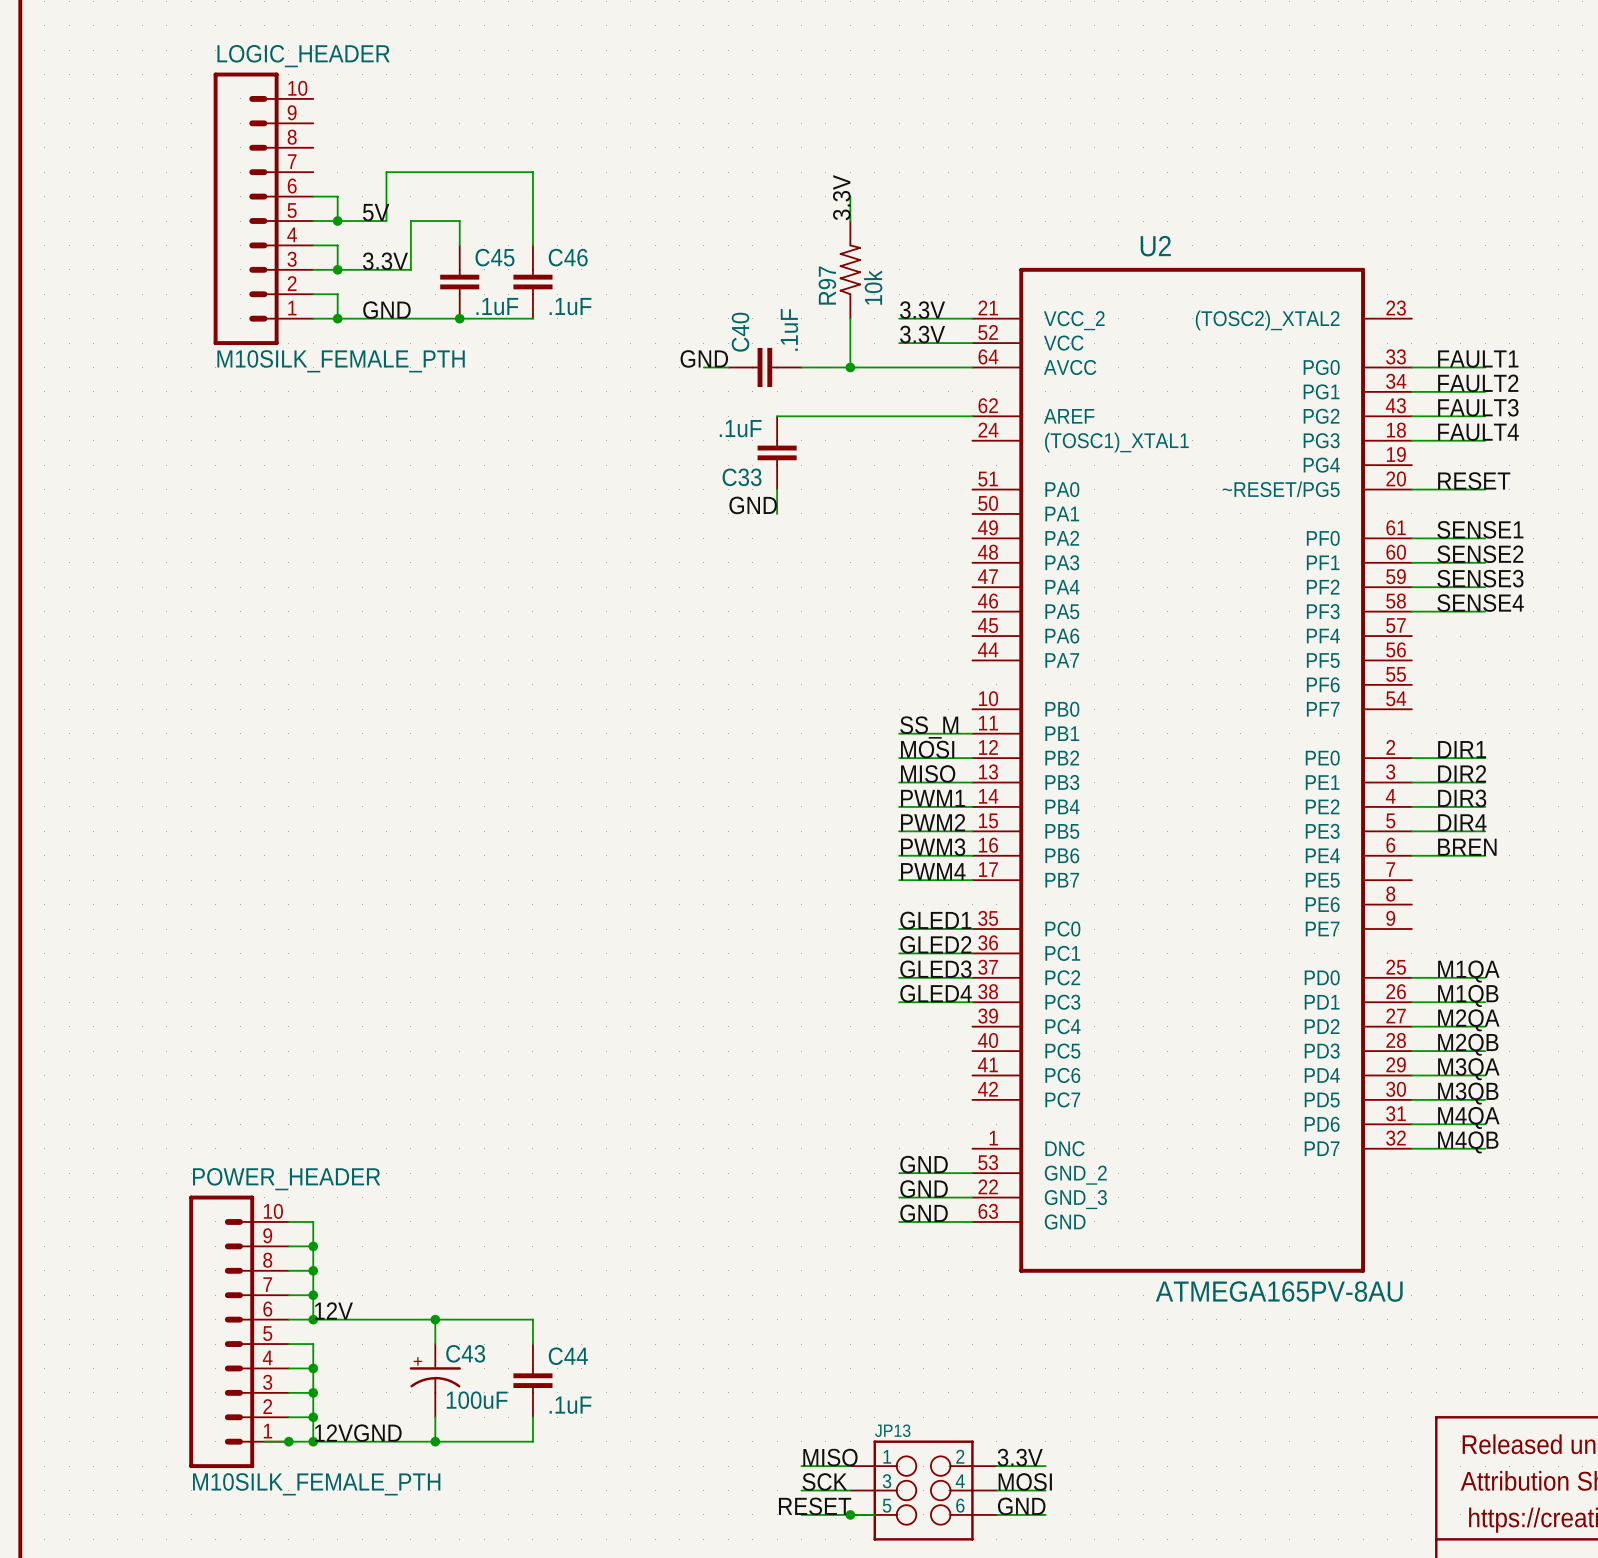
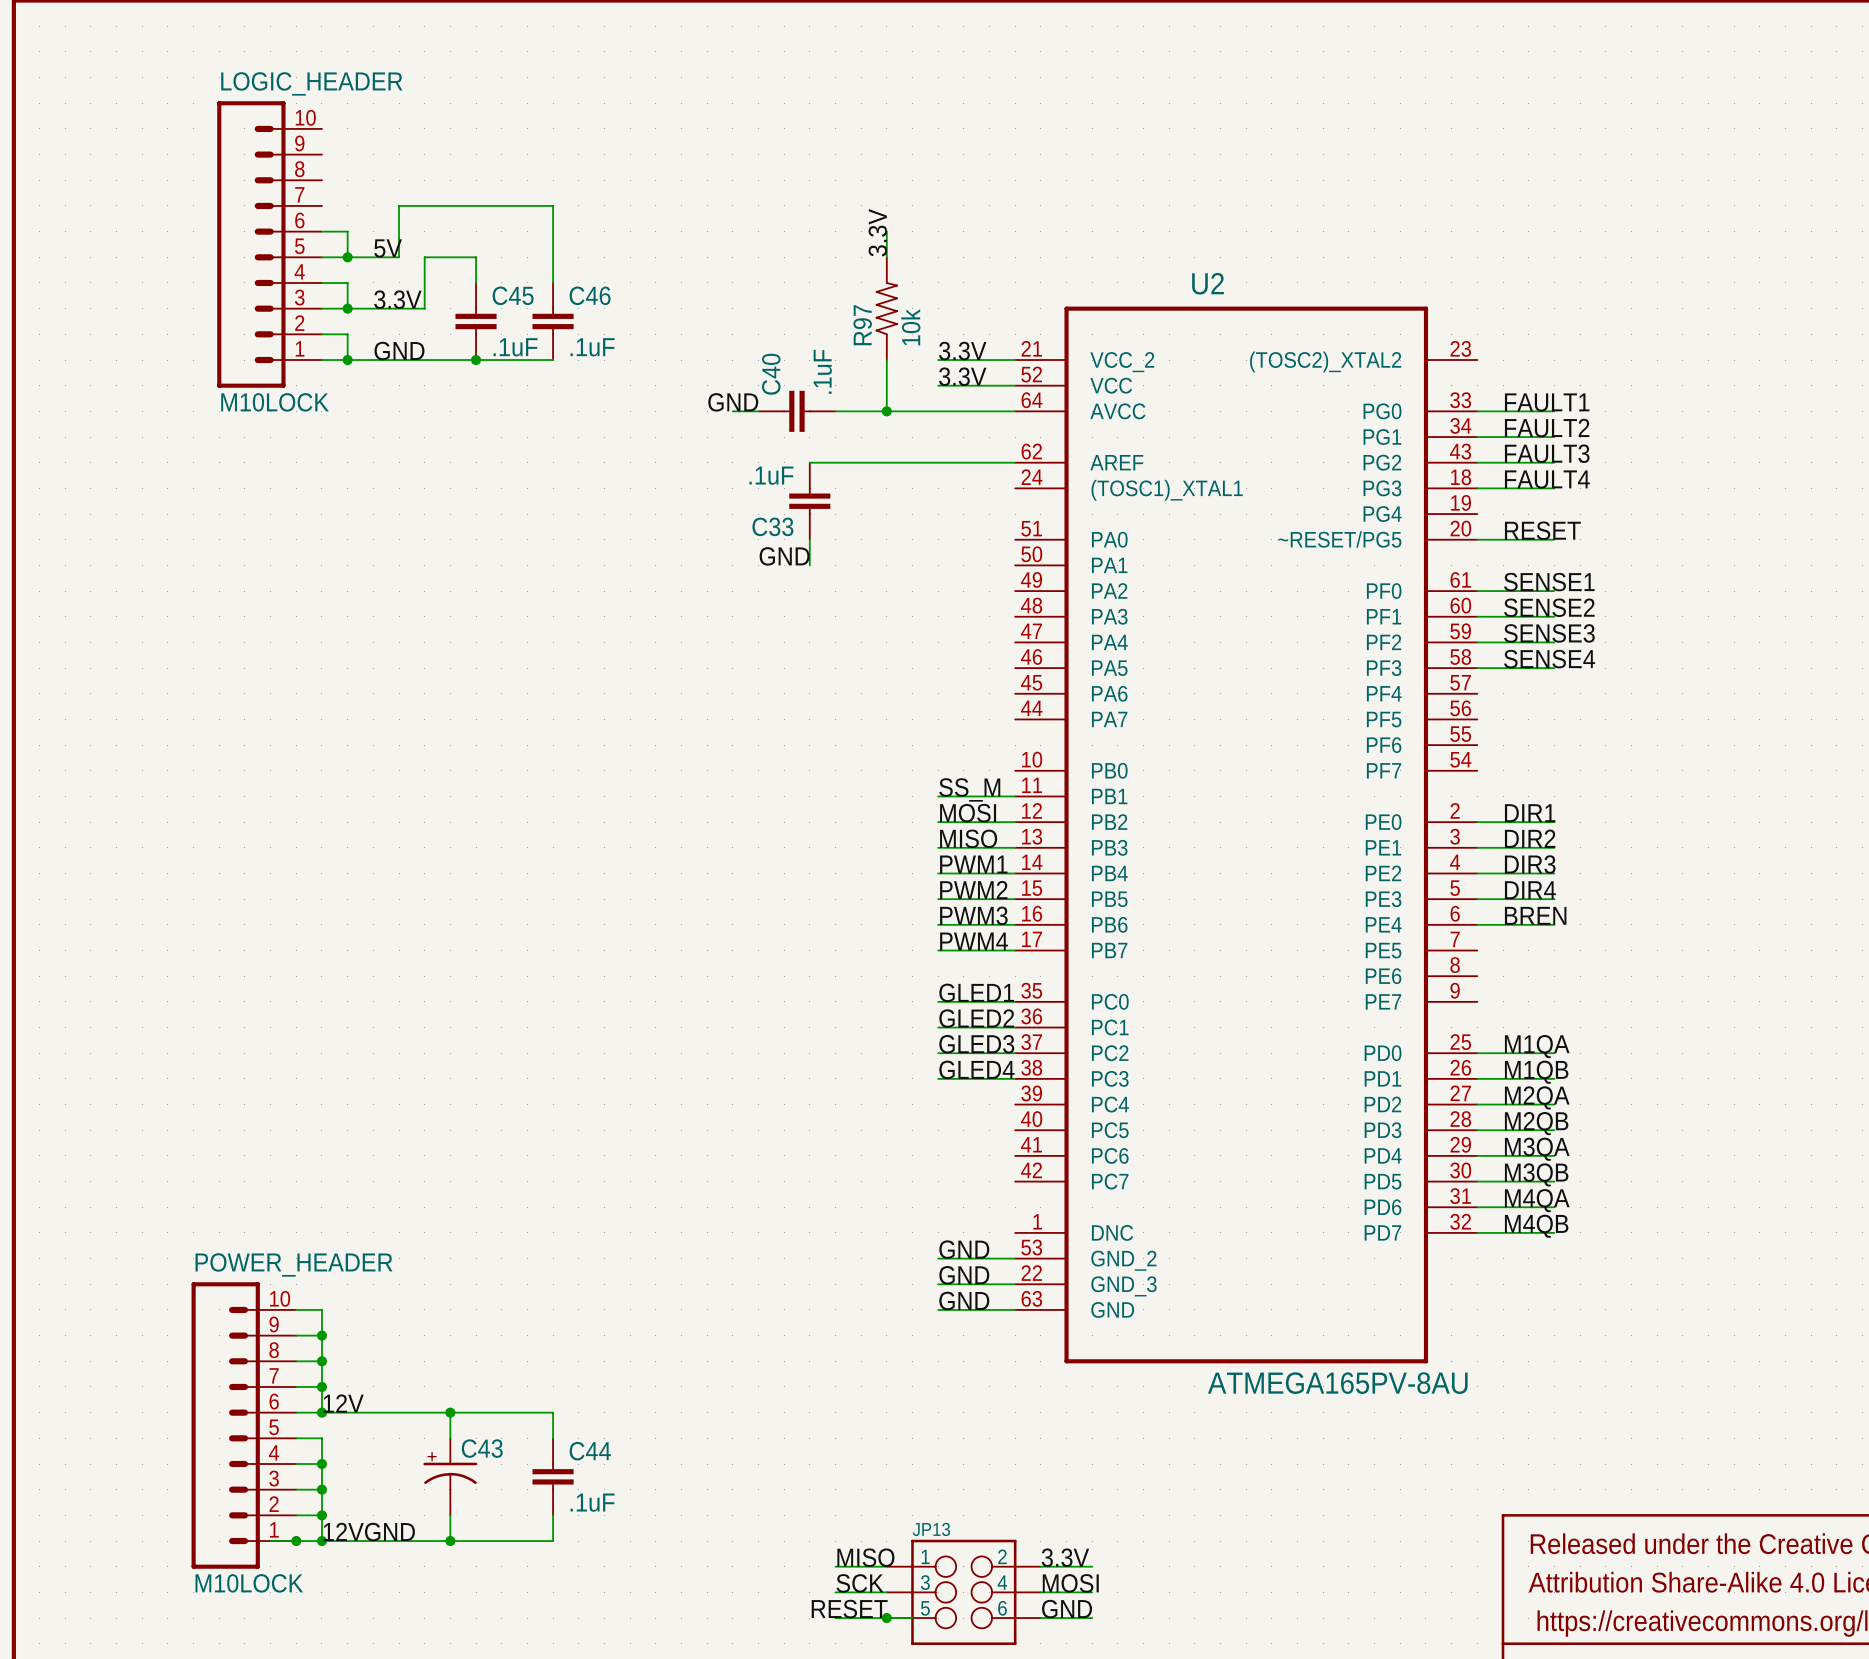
LOGIC_HEADER value: M10SILK_FEMALE_PTH (341, 361) -> M10LOCK (274, 402)
C43 value: 100uF (477, 1400) -> none
POWER_HEADER value: M10SILK_FEMALE_PTH (316, 1484) -> M10LOCK (249, 1583)

